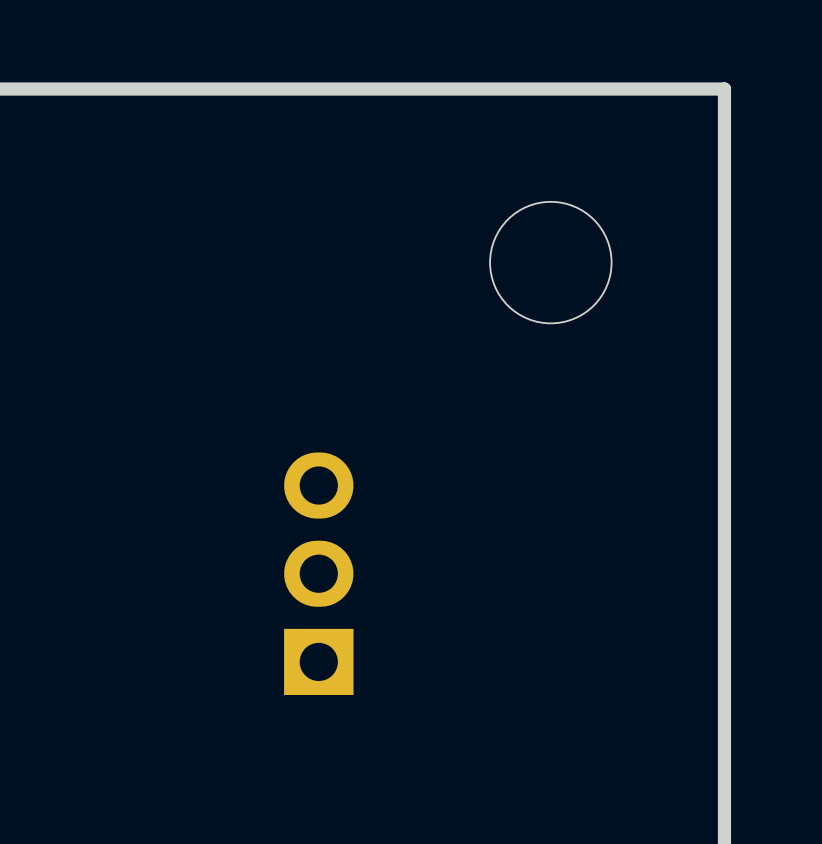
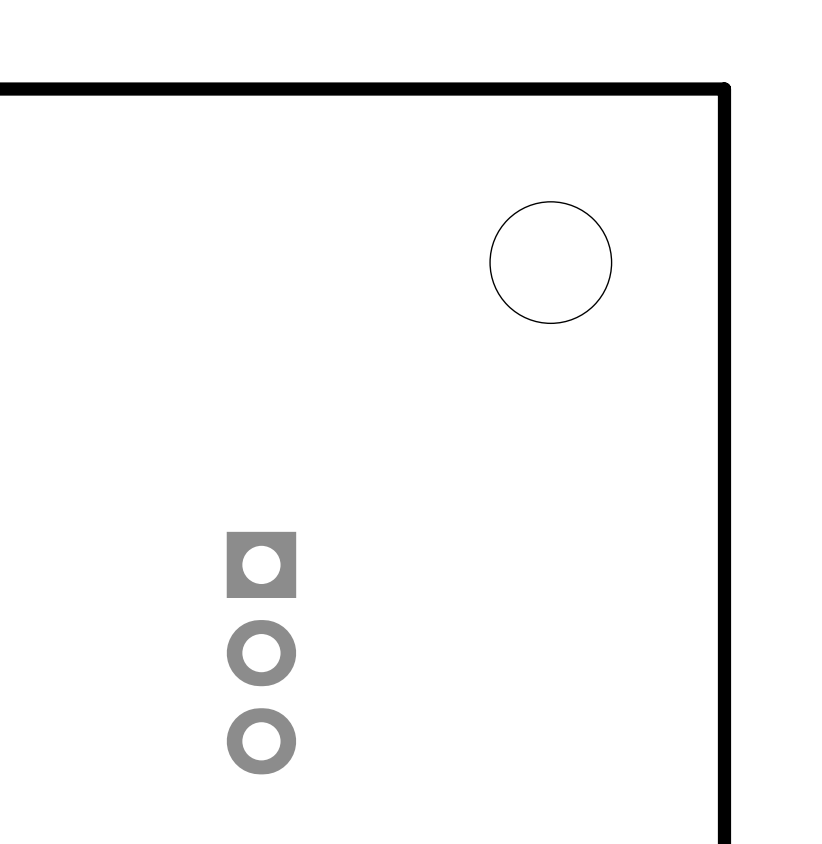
part rotation: 0° (318, 573) -> 180° (261, 653)

